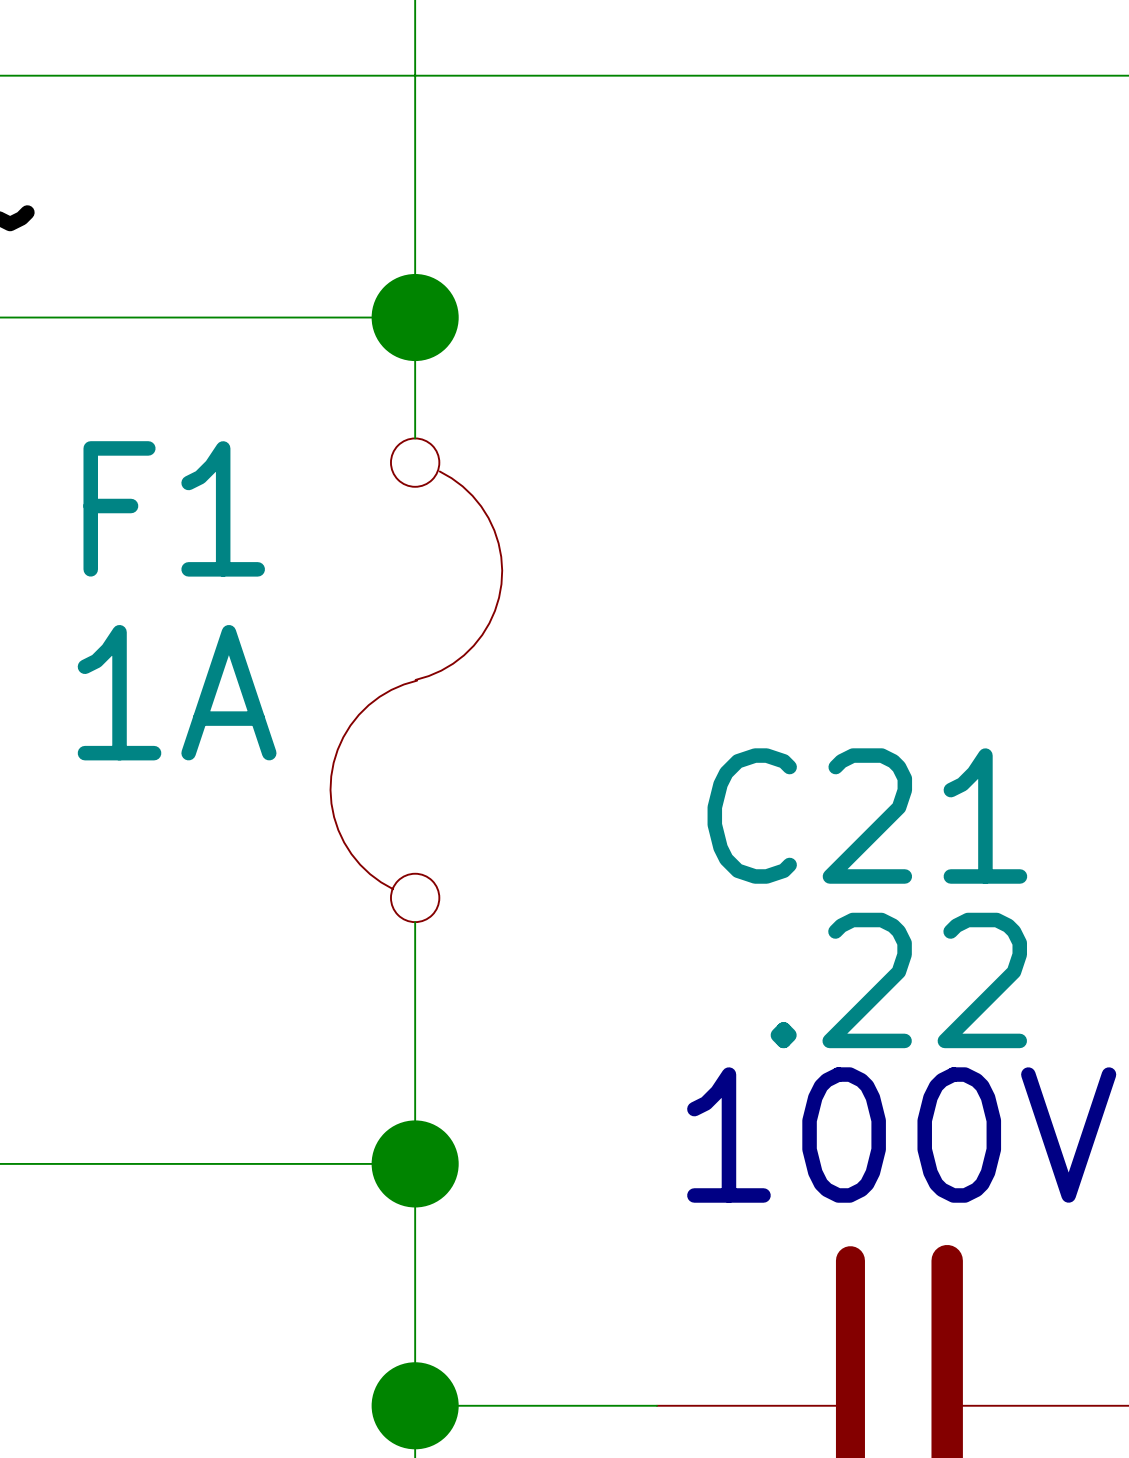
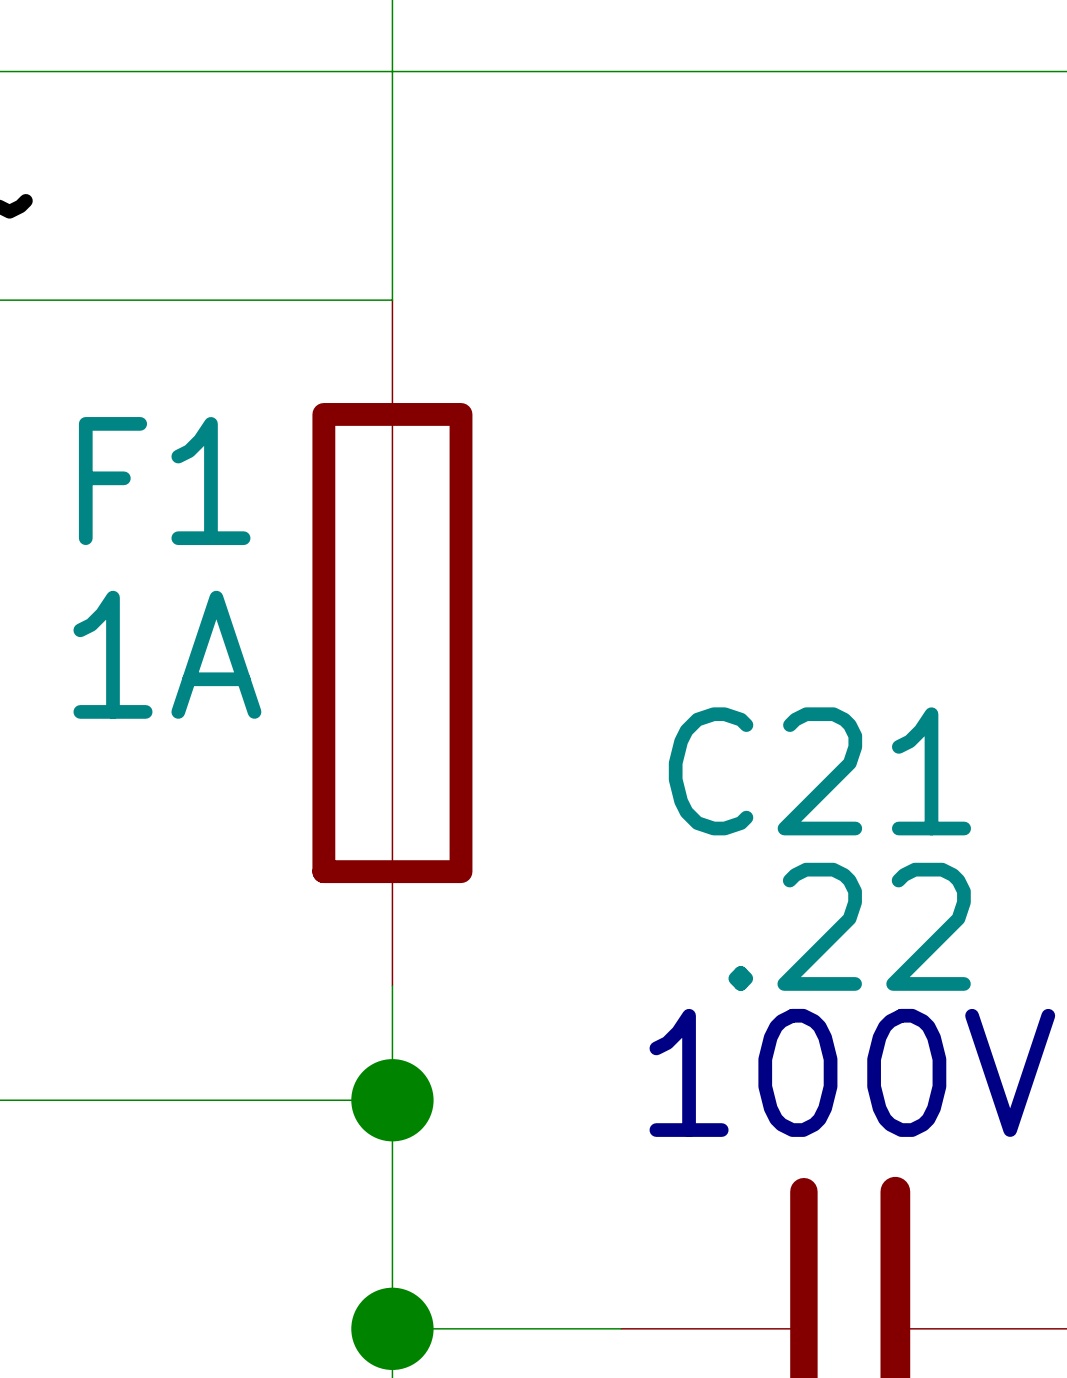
junction: (415, 317) -> none
F1 symbol: [330, 438, 503, 923] -> [312, 300, 473, 986]

